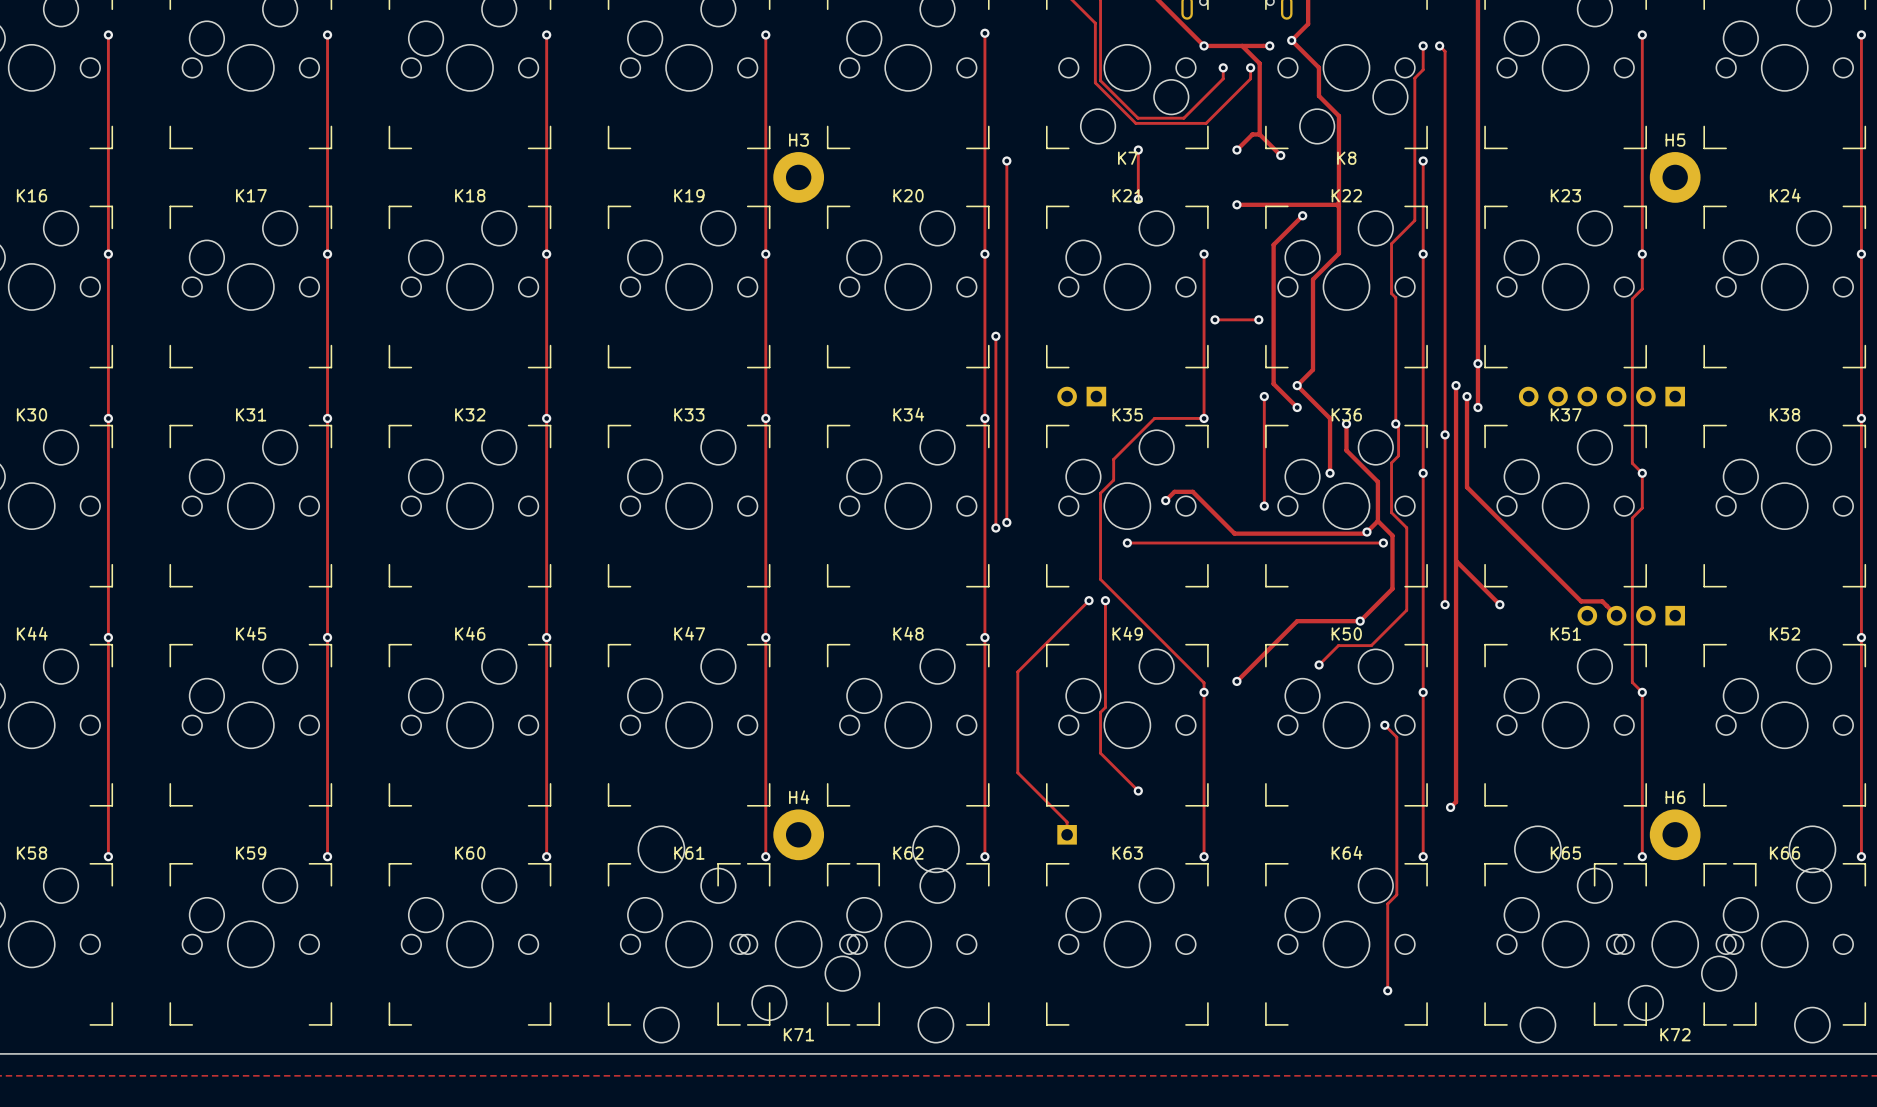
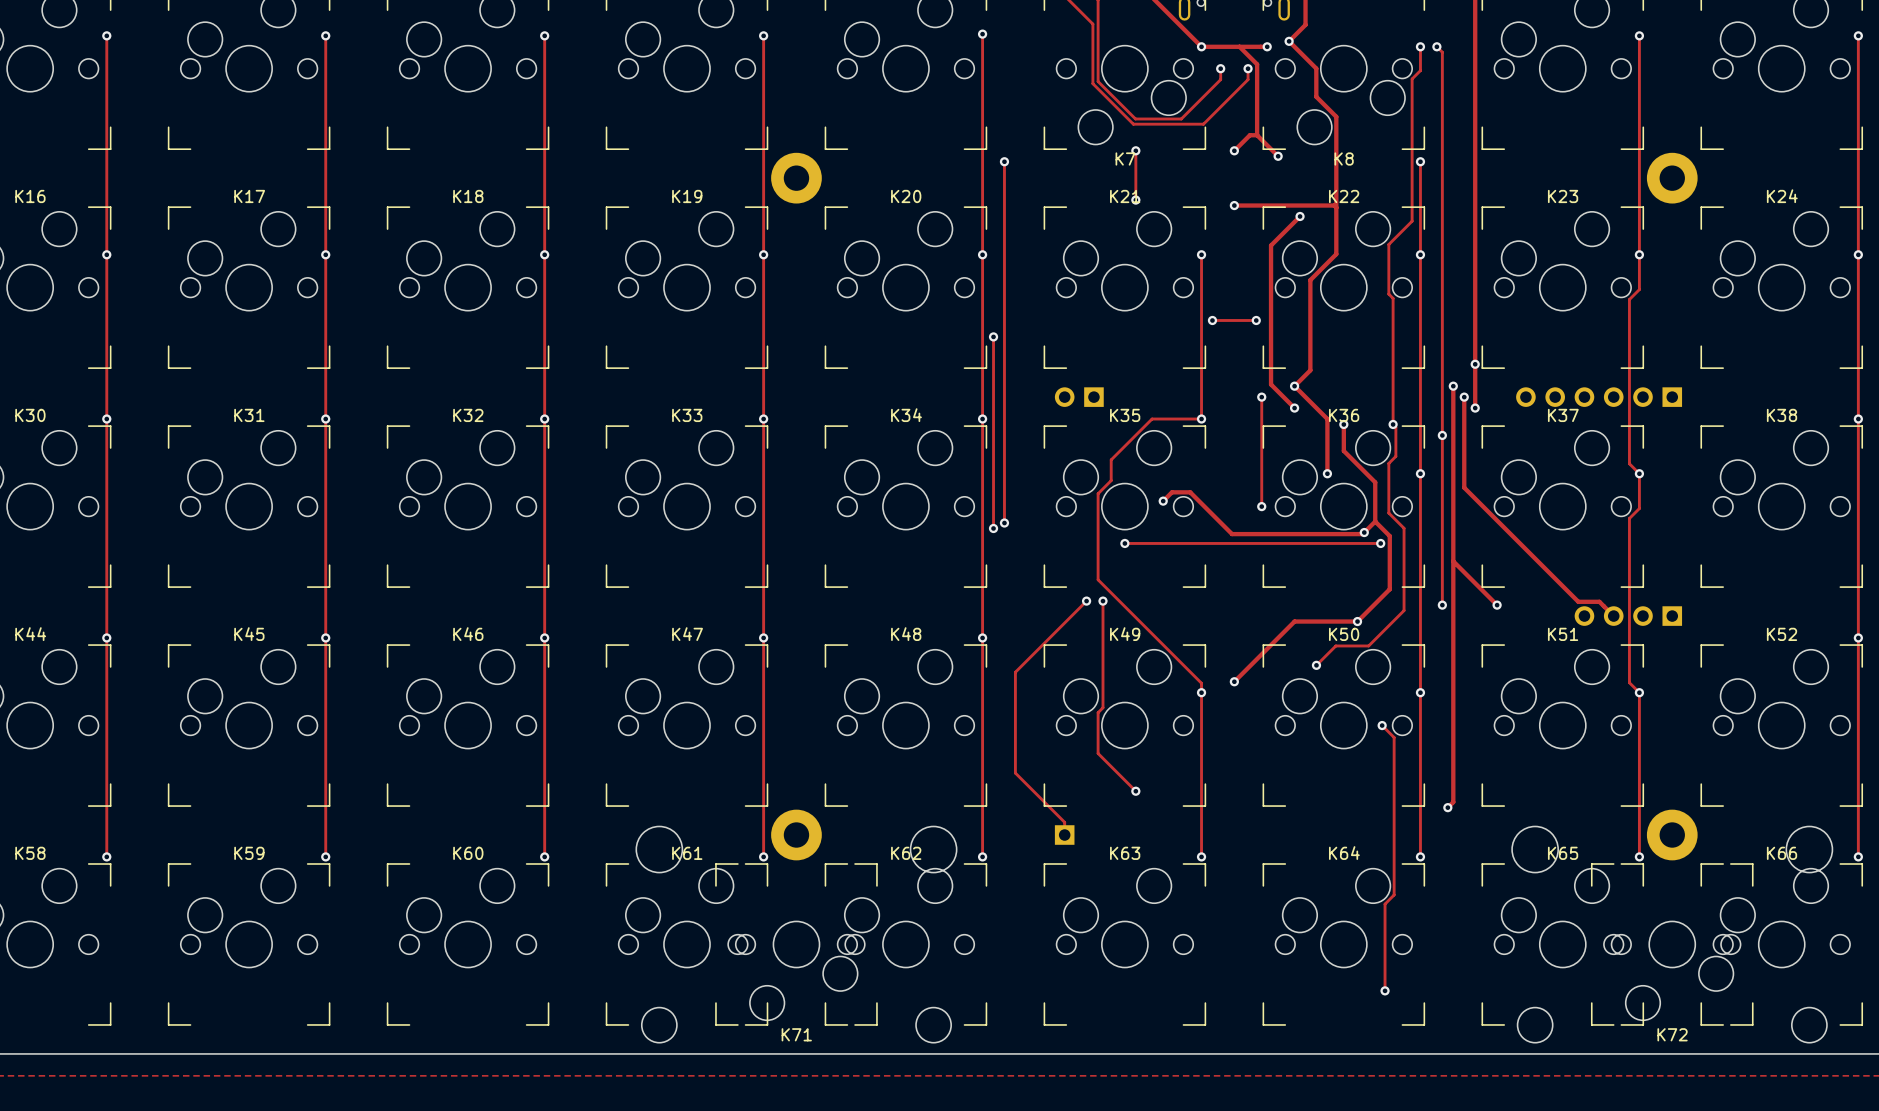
H3 name: H3 (798, 140) -> none
H5 name: H5 (1675, 140) -> none
H4 name: H4 (799, 797) -> none
H6 name: H6 (1675, 797) -> none

